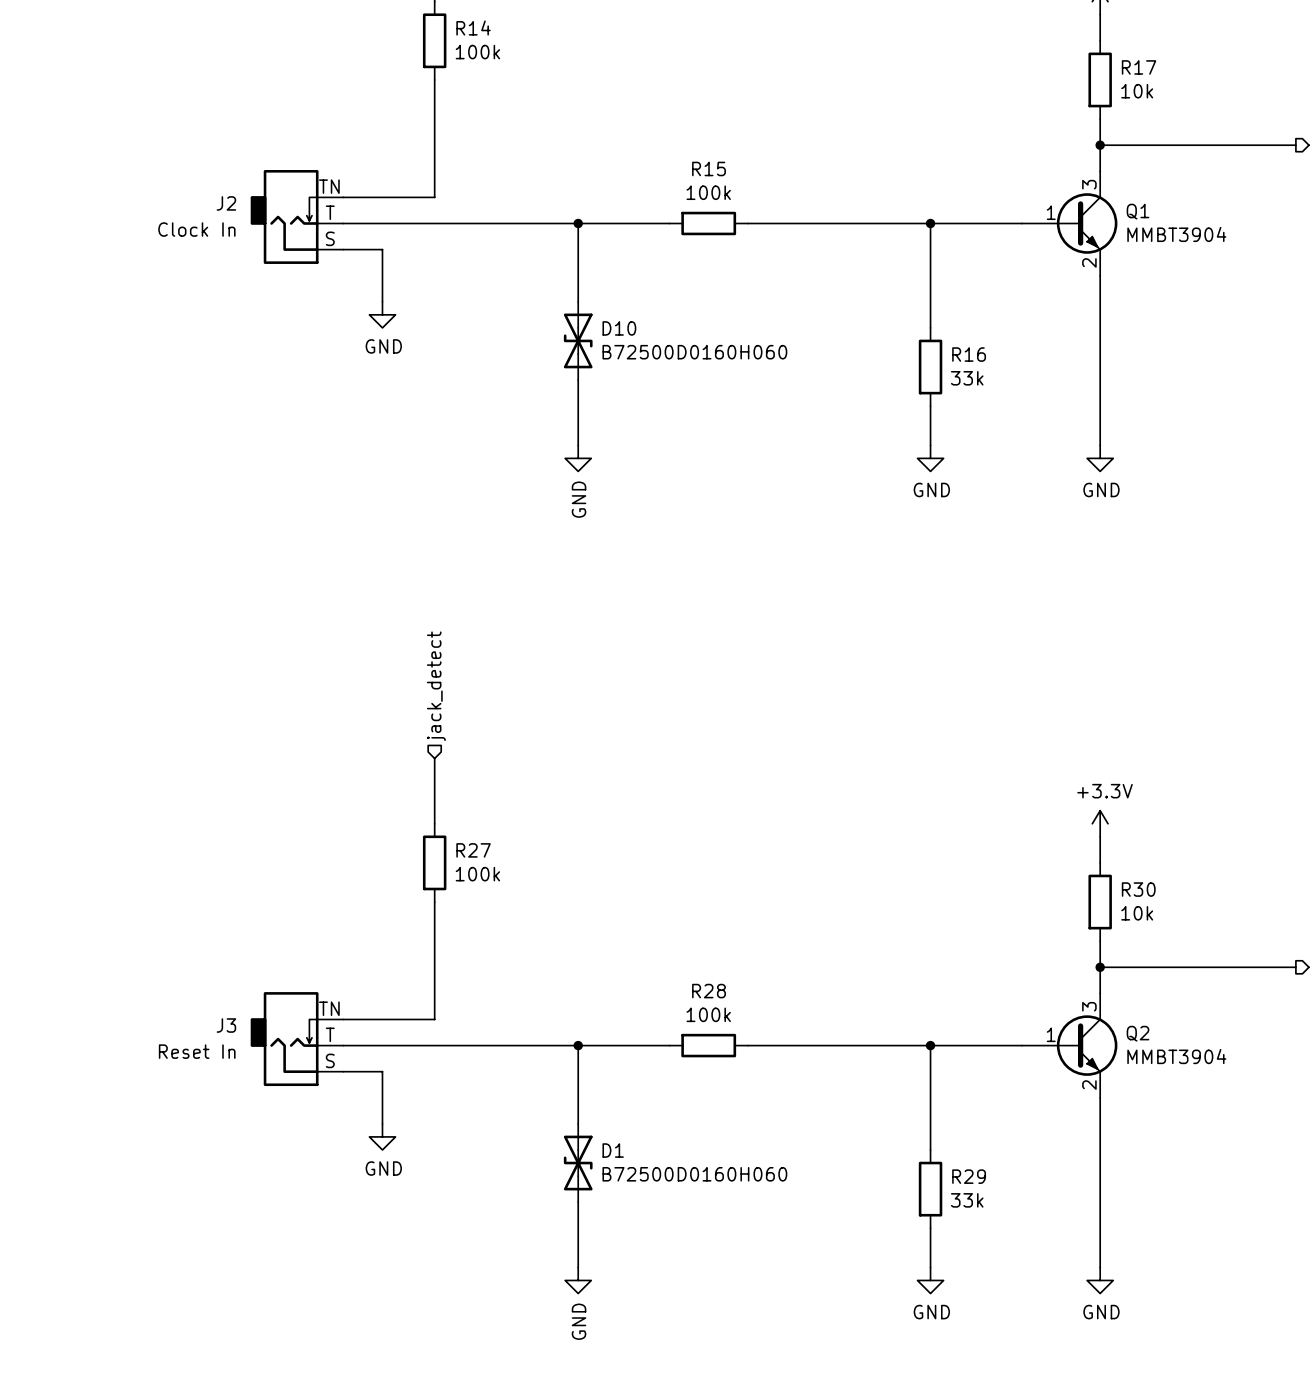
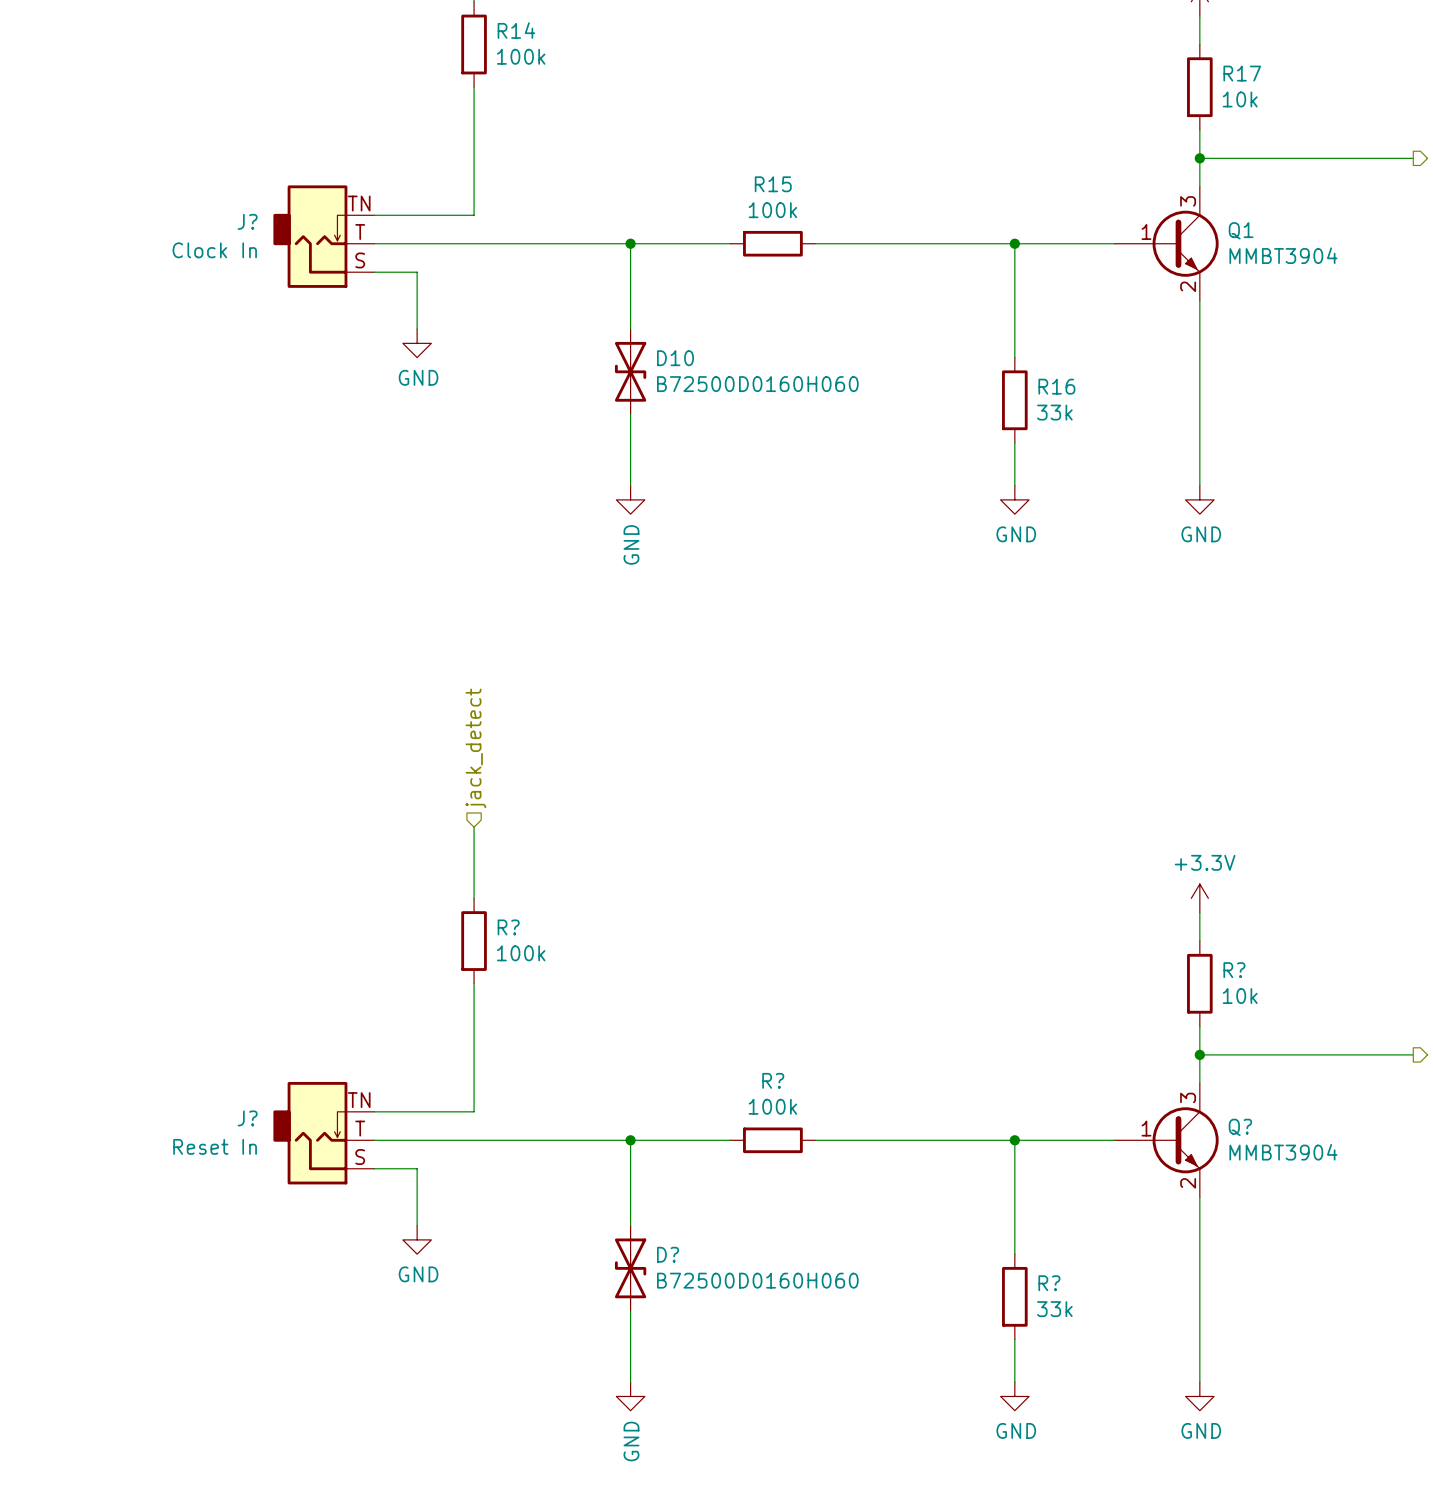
J2 name: J2 (226, 203) -> J? (247, 221)
R27 name: R27 (473, 850) -> R? (508, 927)
R30 name: R30 (1138, 889) -> R? (1234, 970)
R28 name: R28 (709, 991) -> R? (773, 1080)
J3 name: J3 (226, 1025) -> J? (247, 1118)
Q2 name: Q2 (1138, 1033) -> Q? (1240, 1127)
D1 name: D1 (613, 1150) -> D? (668, 1254)
R29 name: R29 (969, 1176) -> R? (1049, 1283)

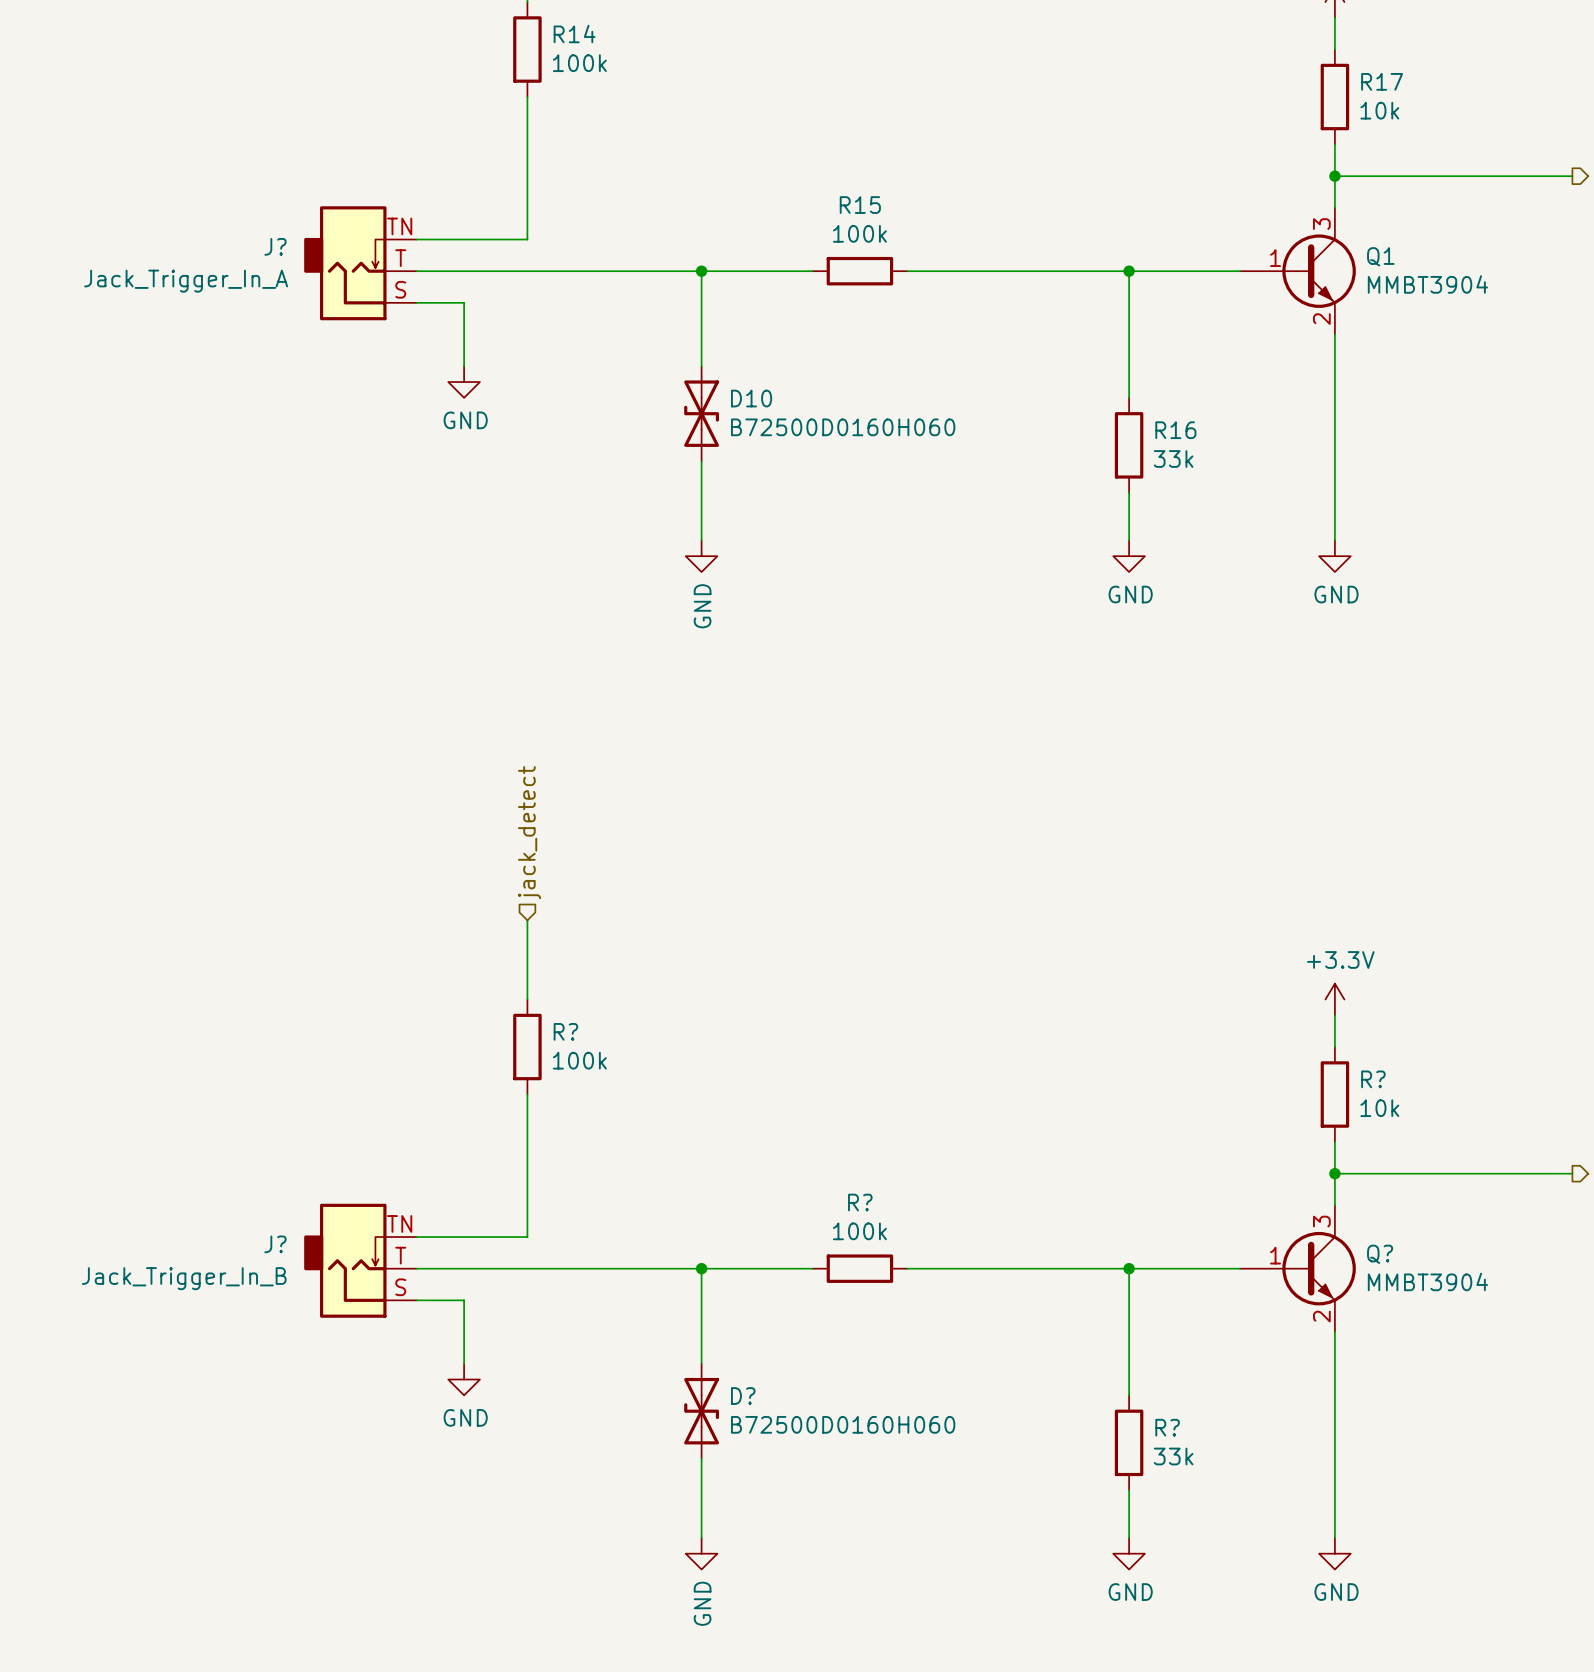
J? value: Clock In (214, 250) -> Jack_Trigger_In_A (186, 281)
J? value: Reset In (215, 1146) -> Jack_Trigger_In_B (184, 1278)

